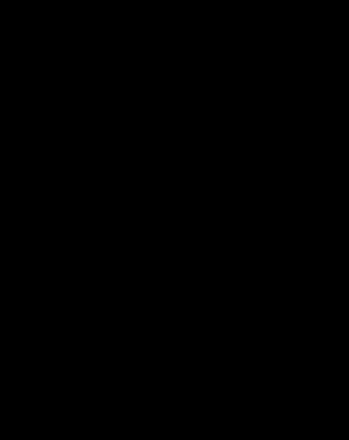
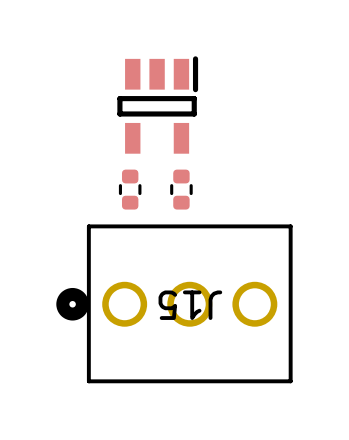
part: none -> (157, 105)
part: none -> (130, 189)
part: none -> (181, 189)
J15: none -> (174, 303)

